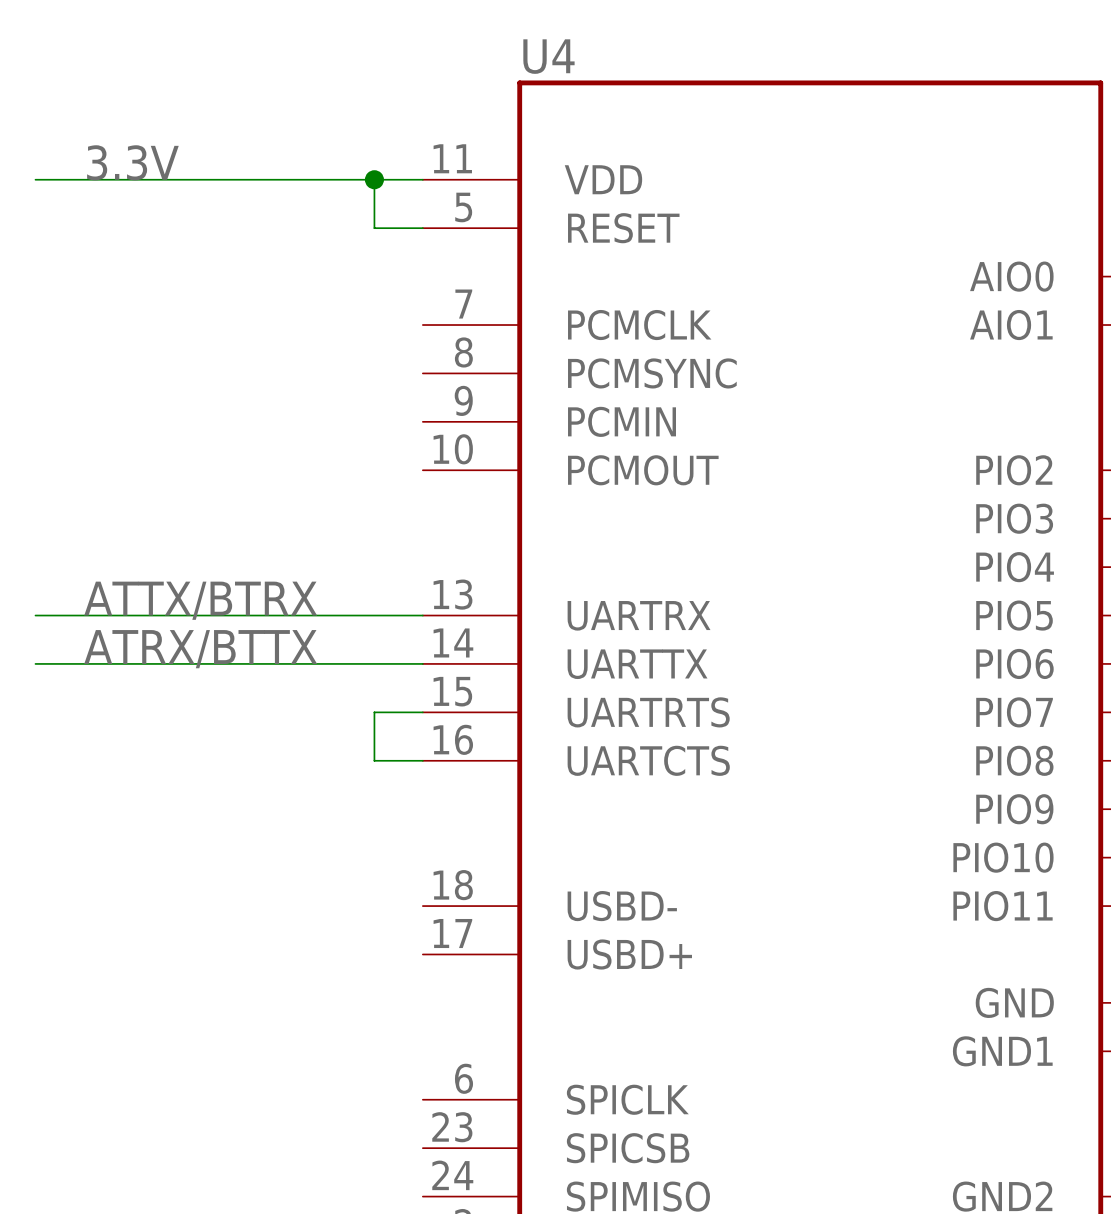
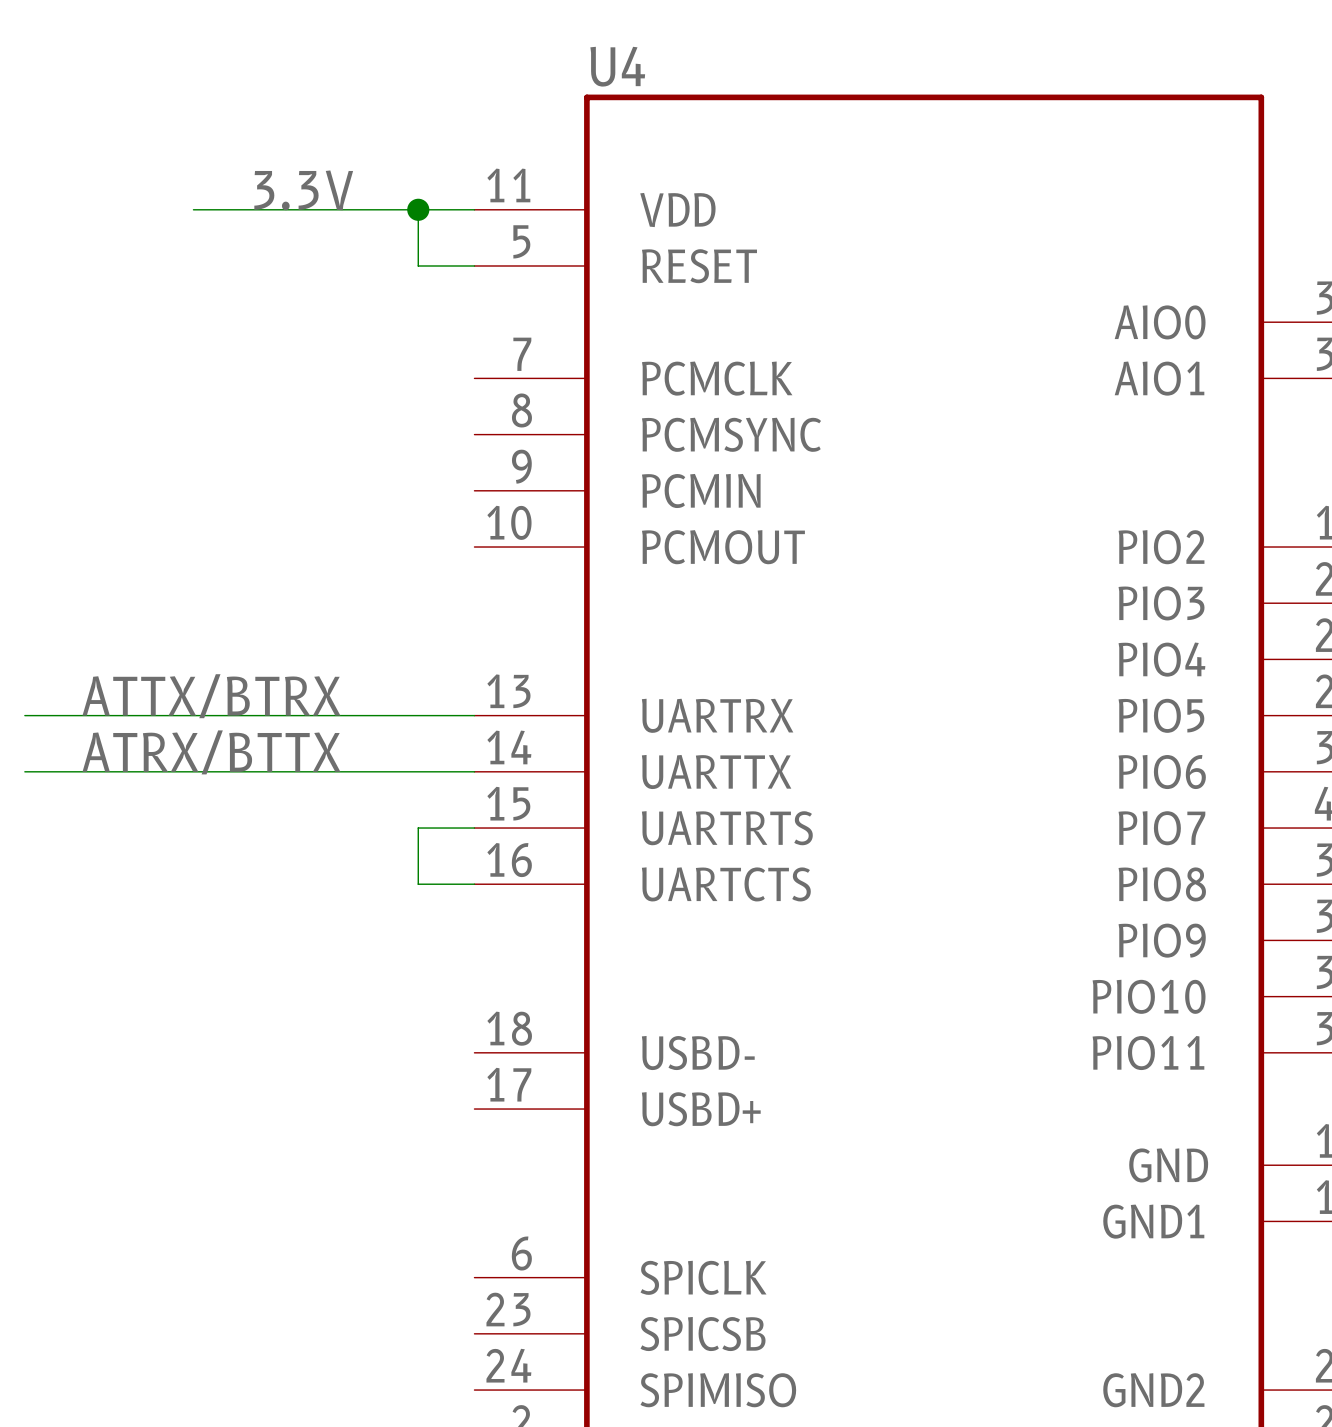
label position: 3.3V (132, 162) -> 3.3V (303, 190)
wire: (35, 179) (180, 179) -> none

